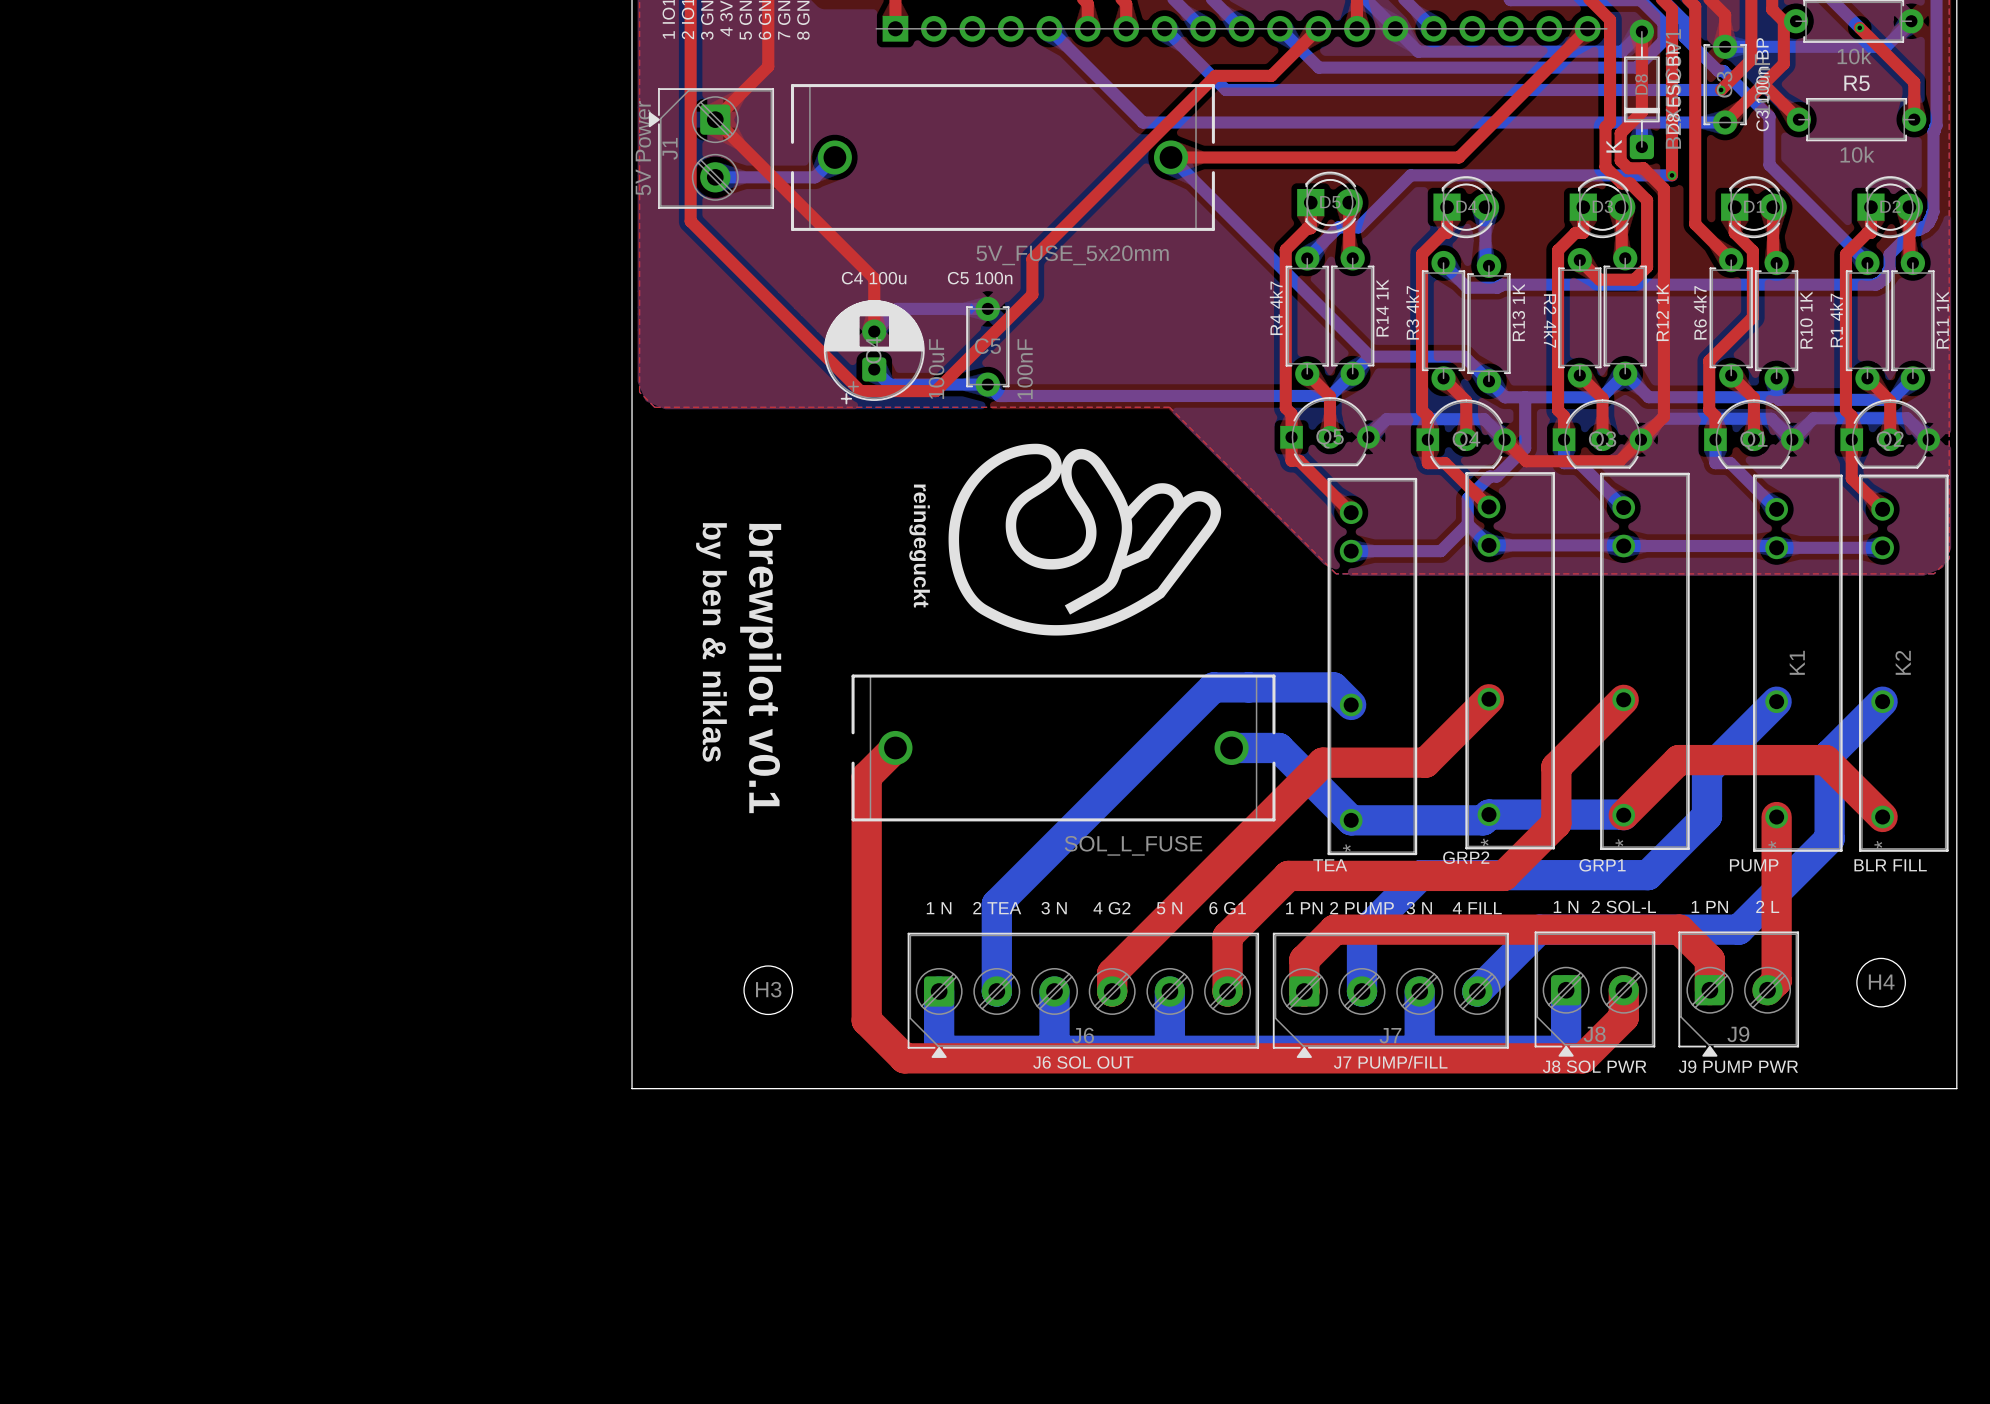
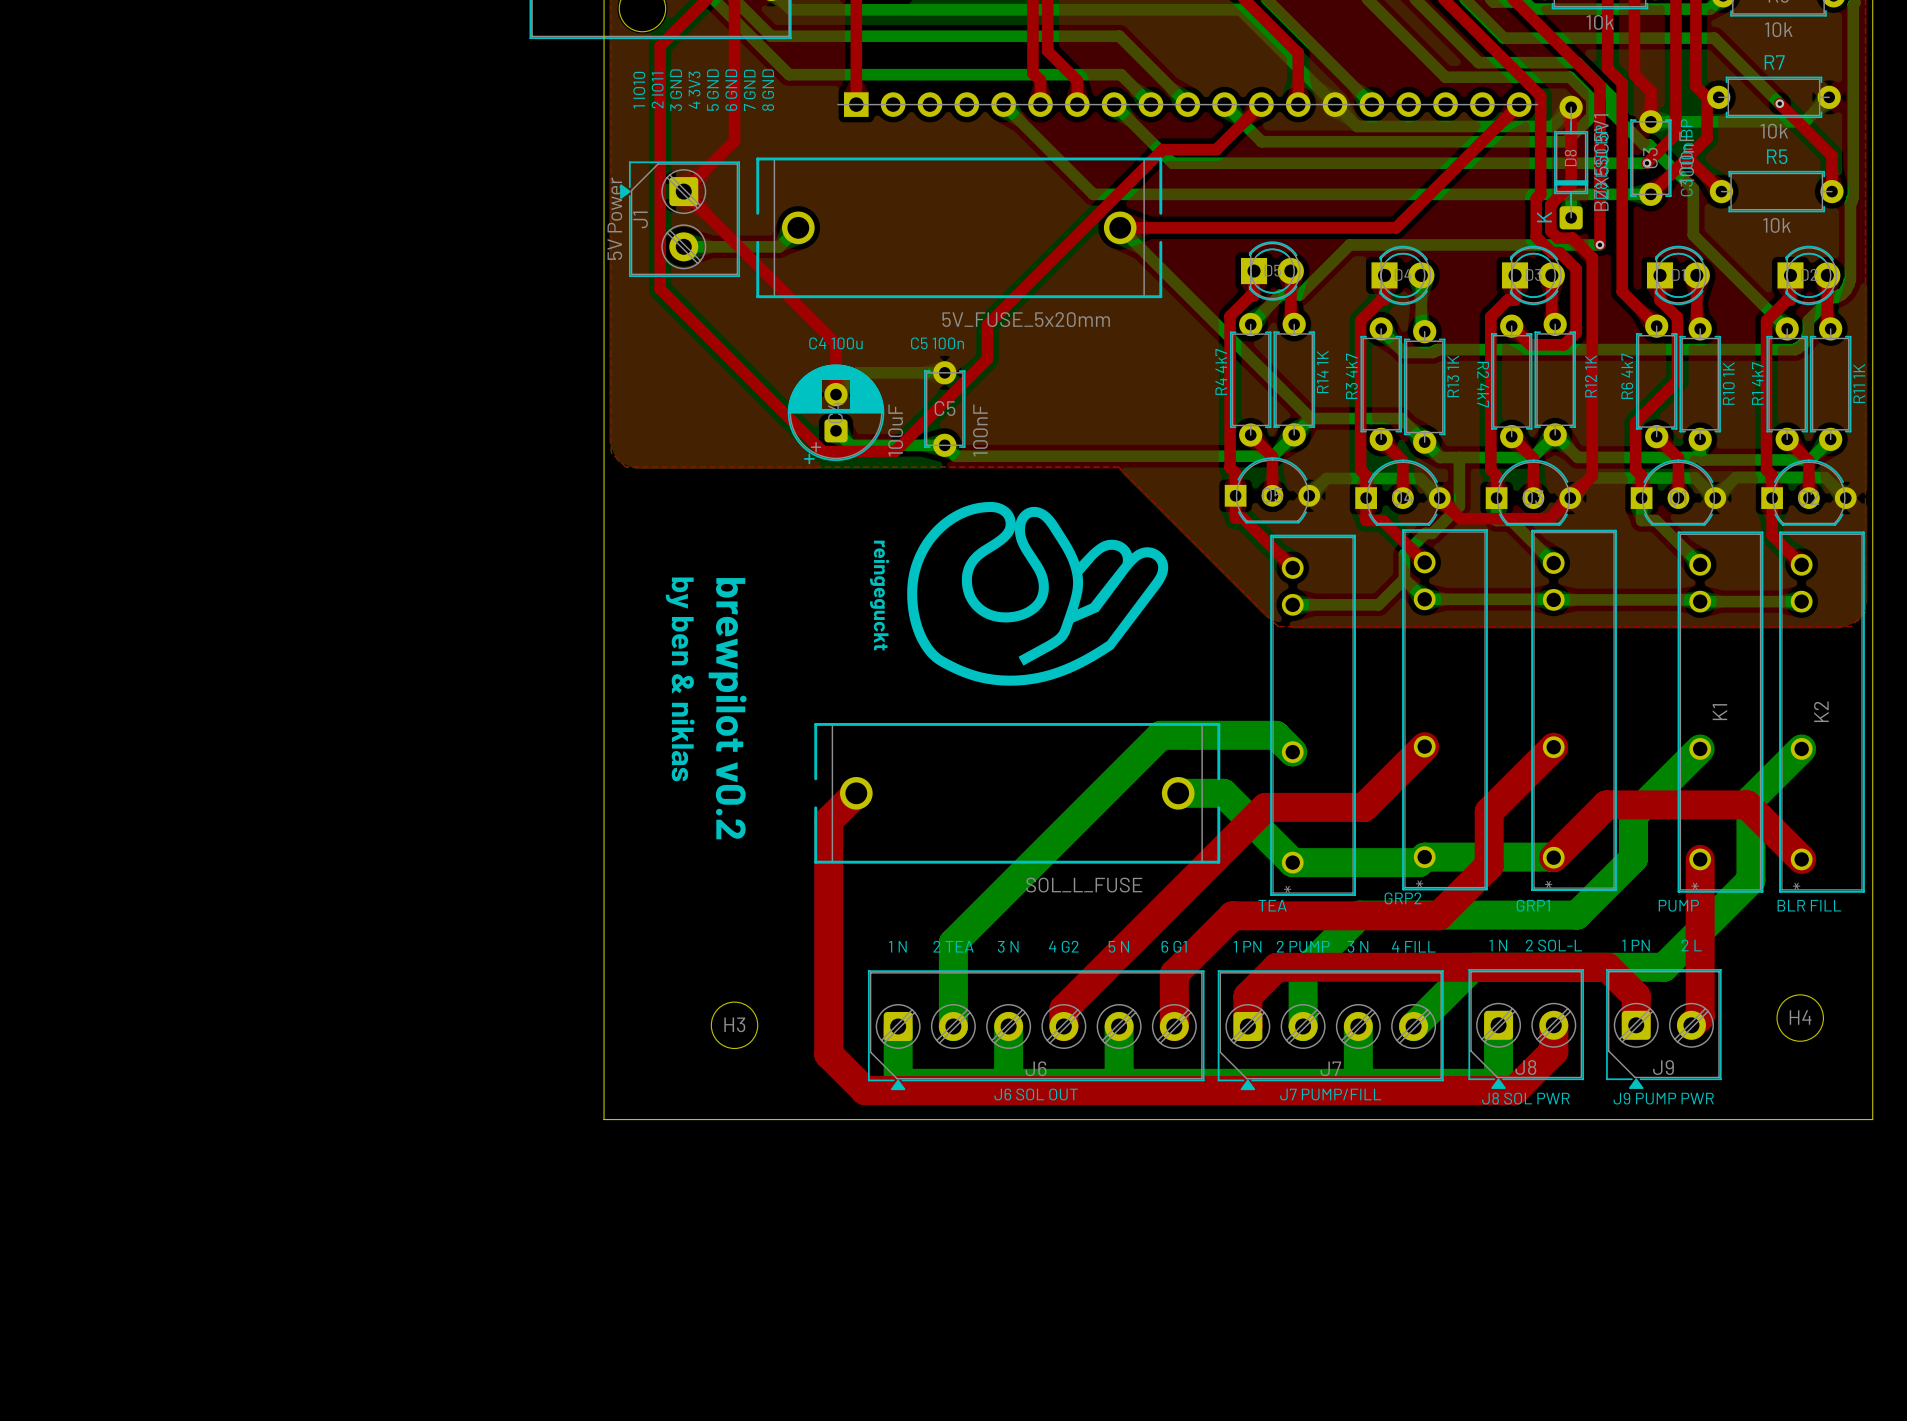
text: brewpilot v0.1 (760, 668) -> brewpilot v0.2 (727, 708)

